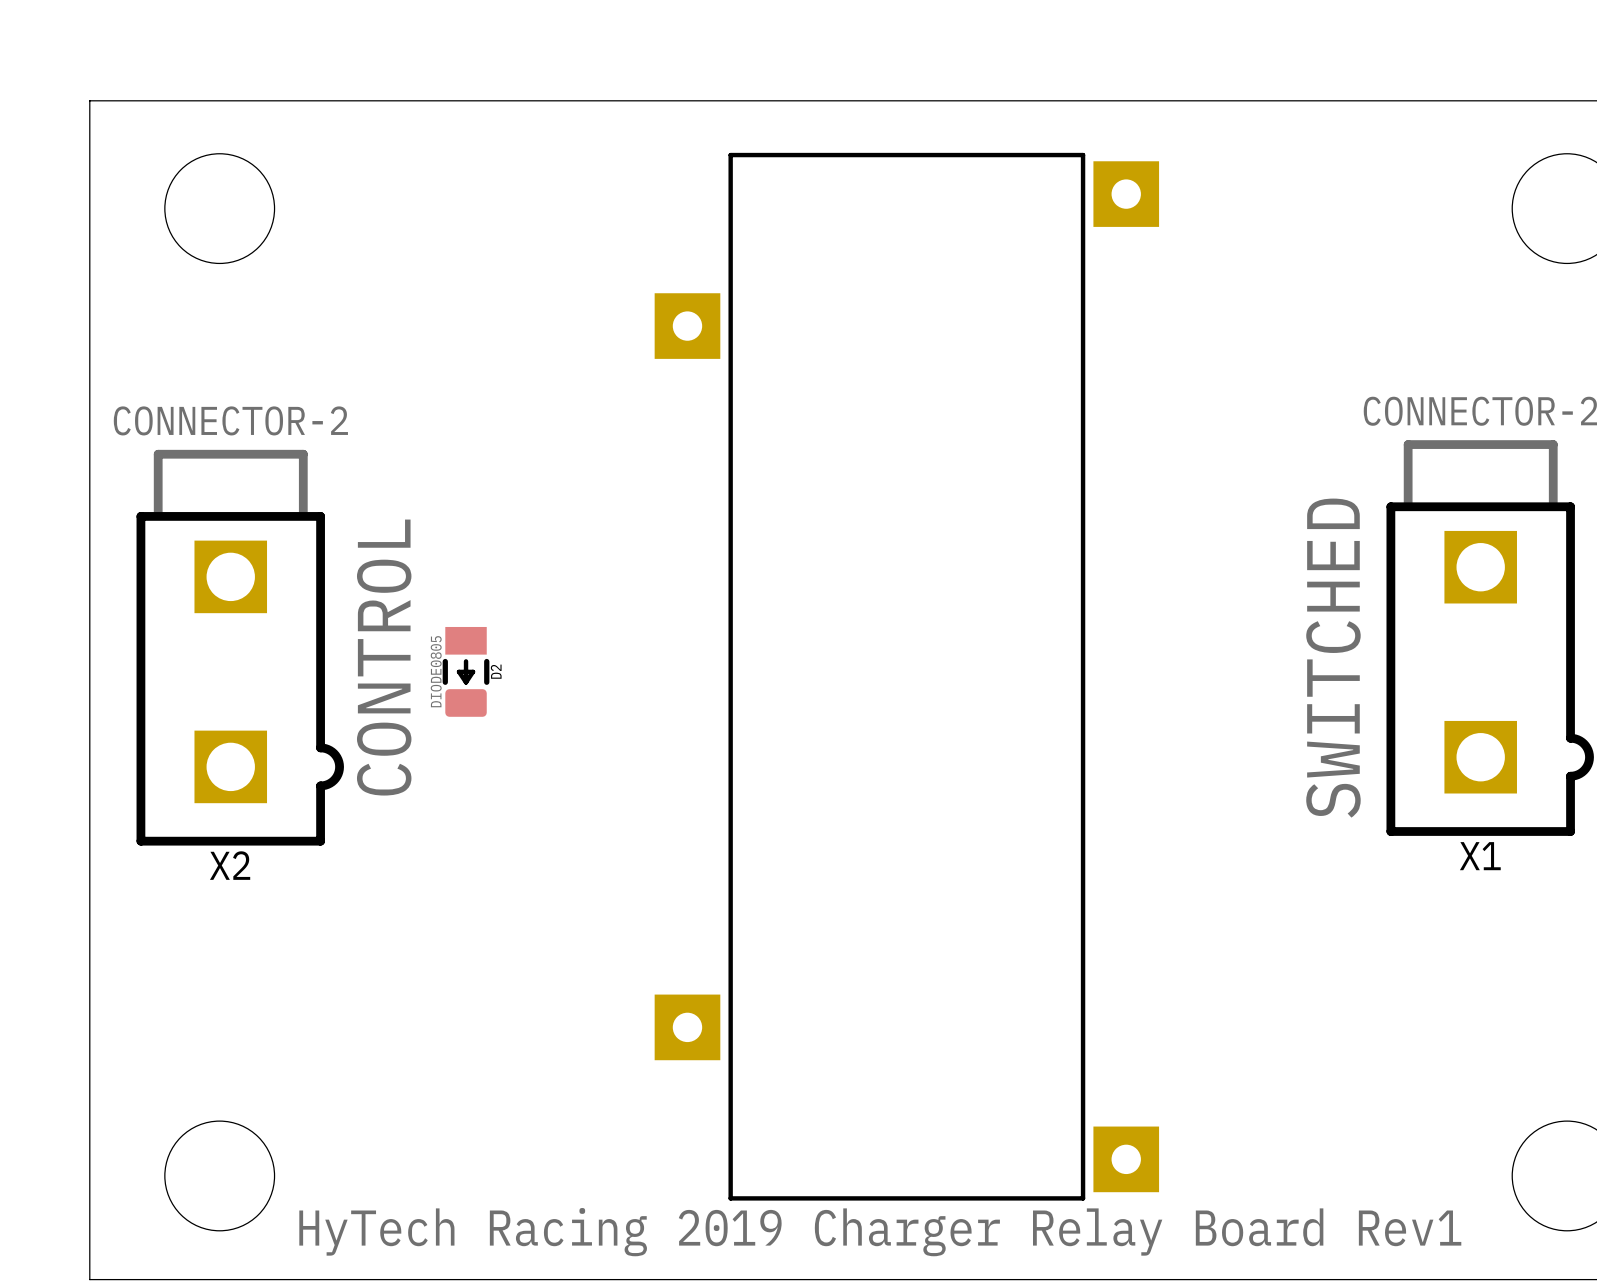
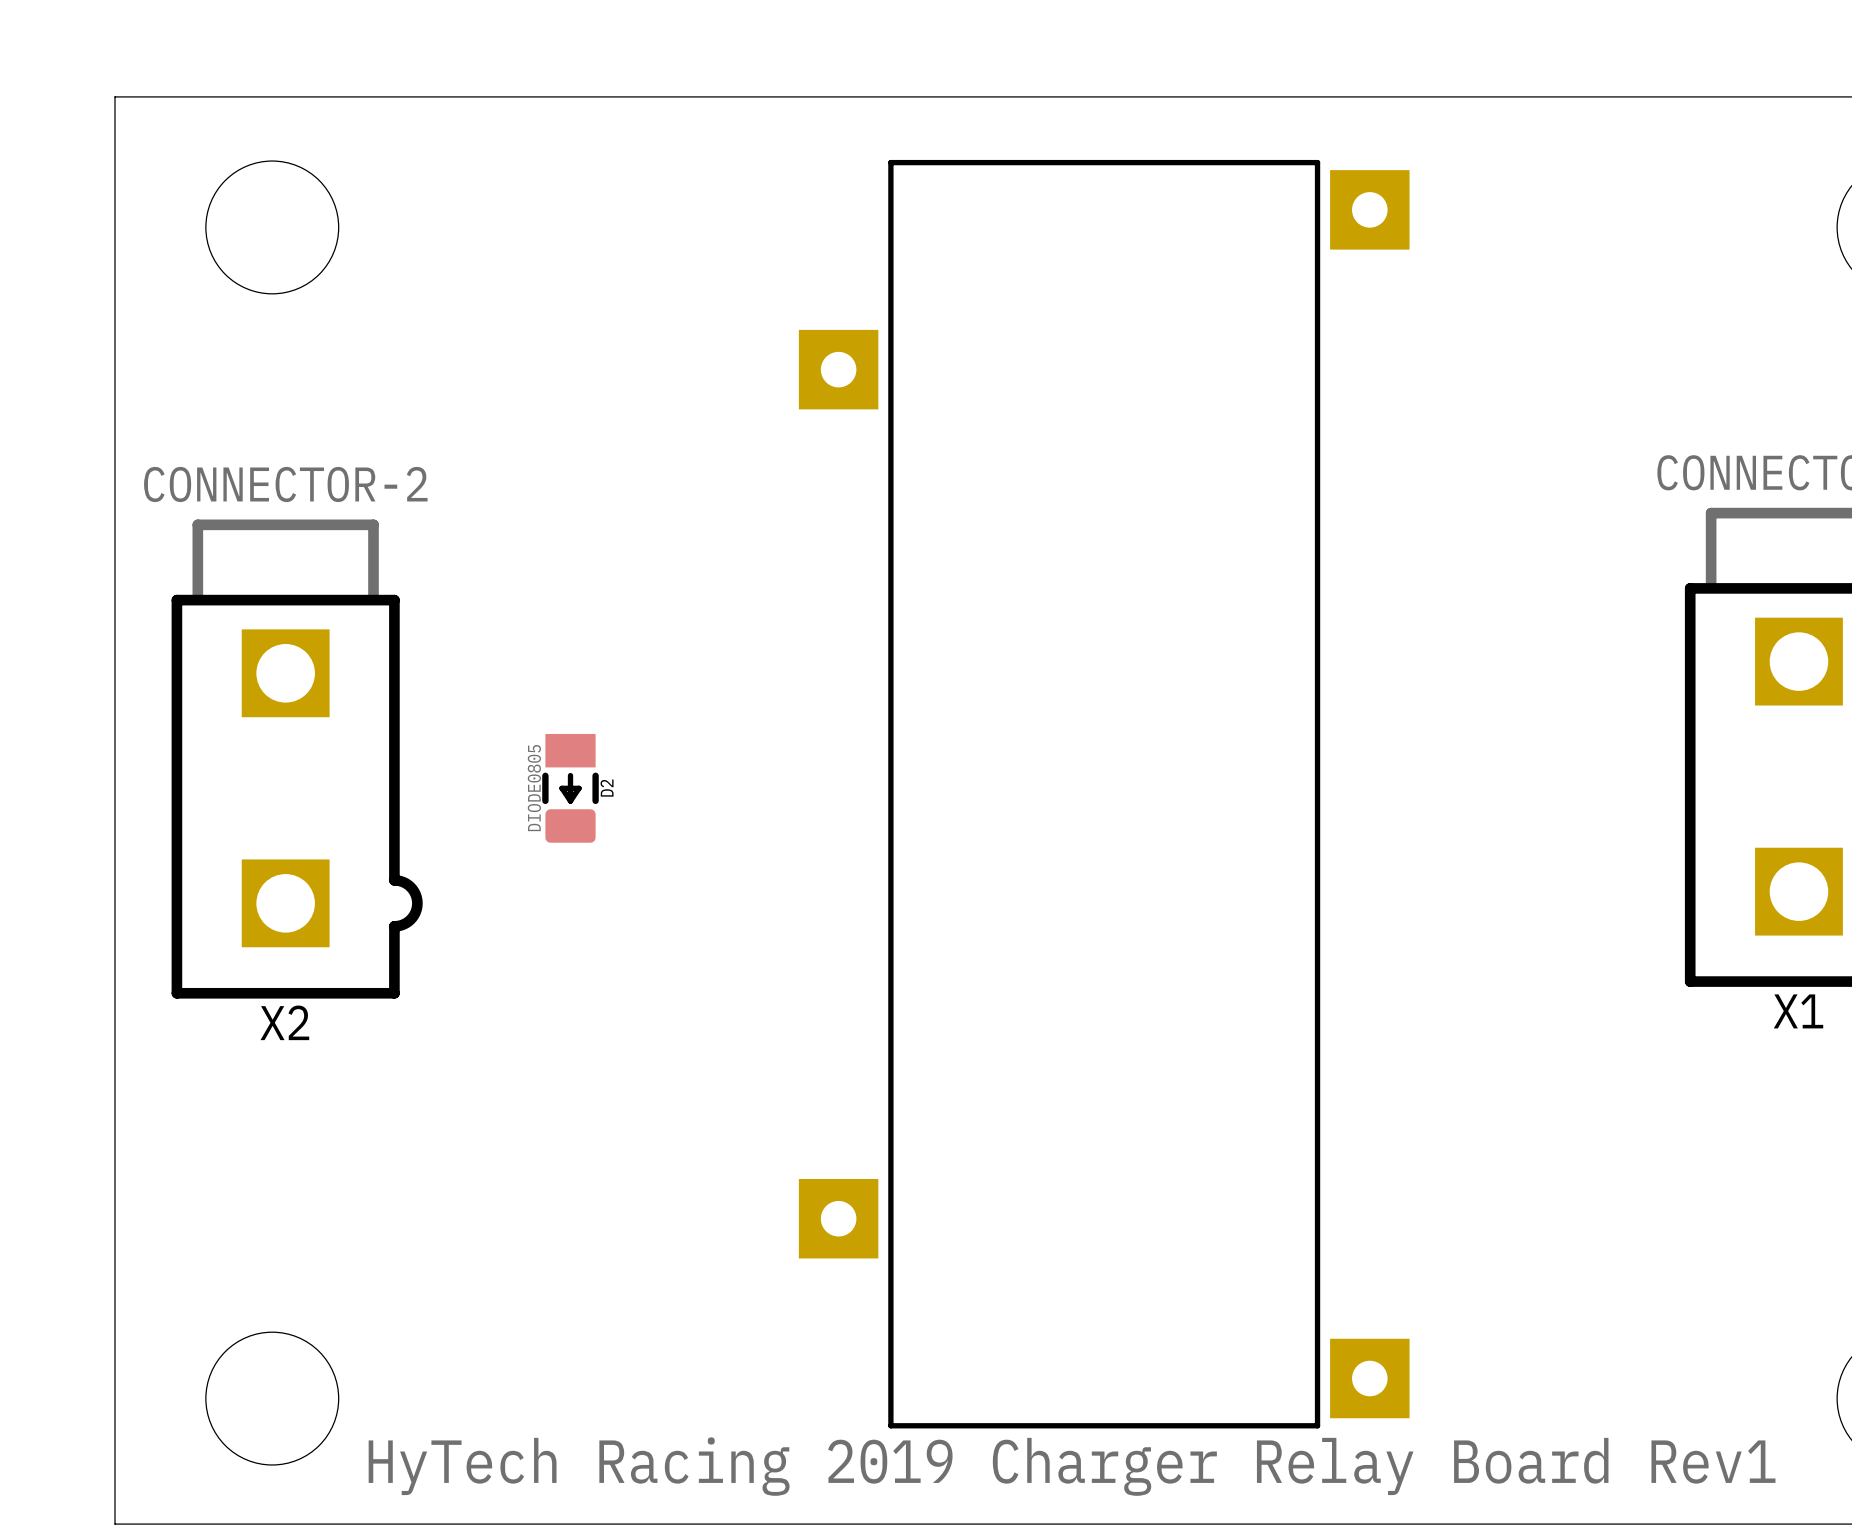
text: CONTROL (384, 657) -> none
text: SWITCHED (1333, 658) -> none

